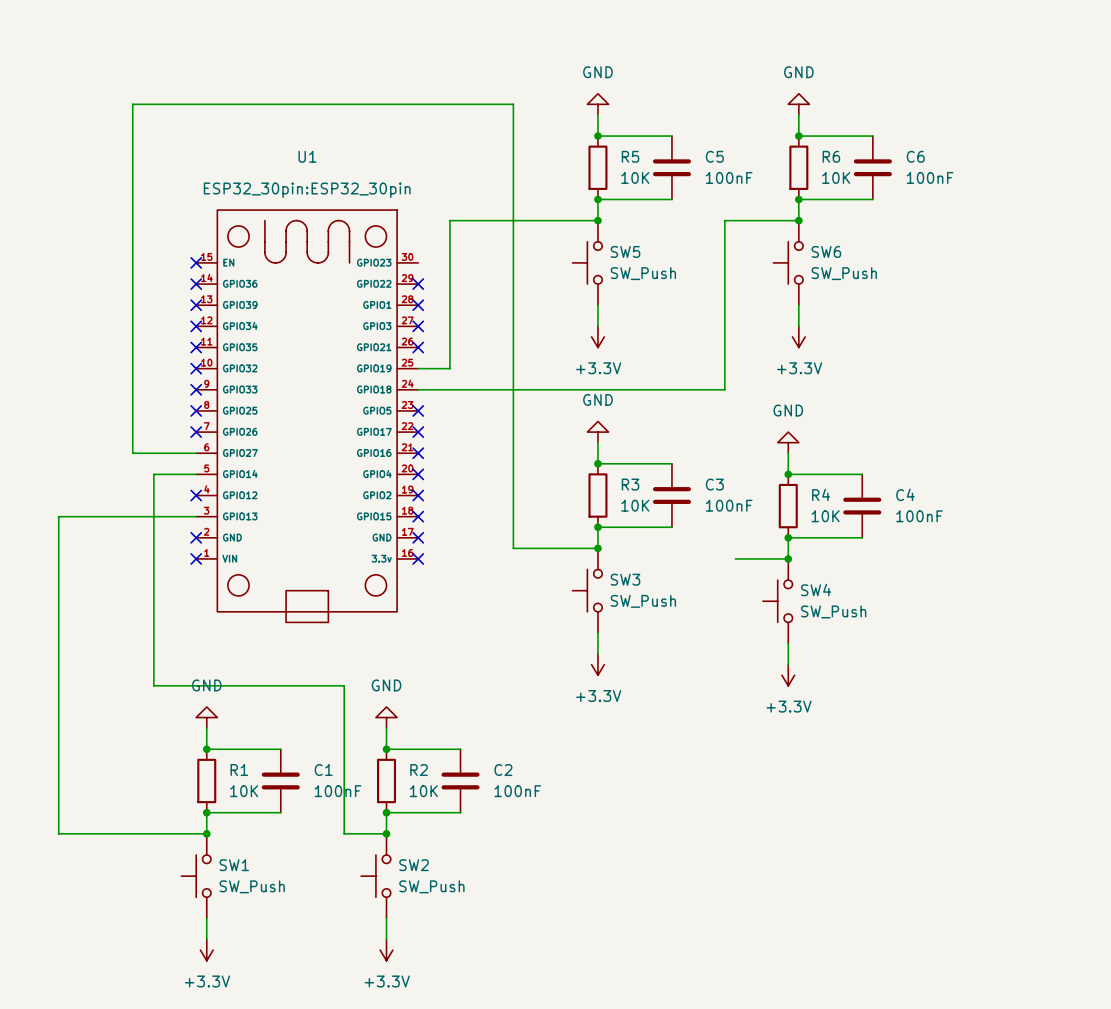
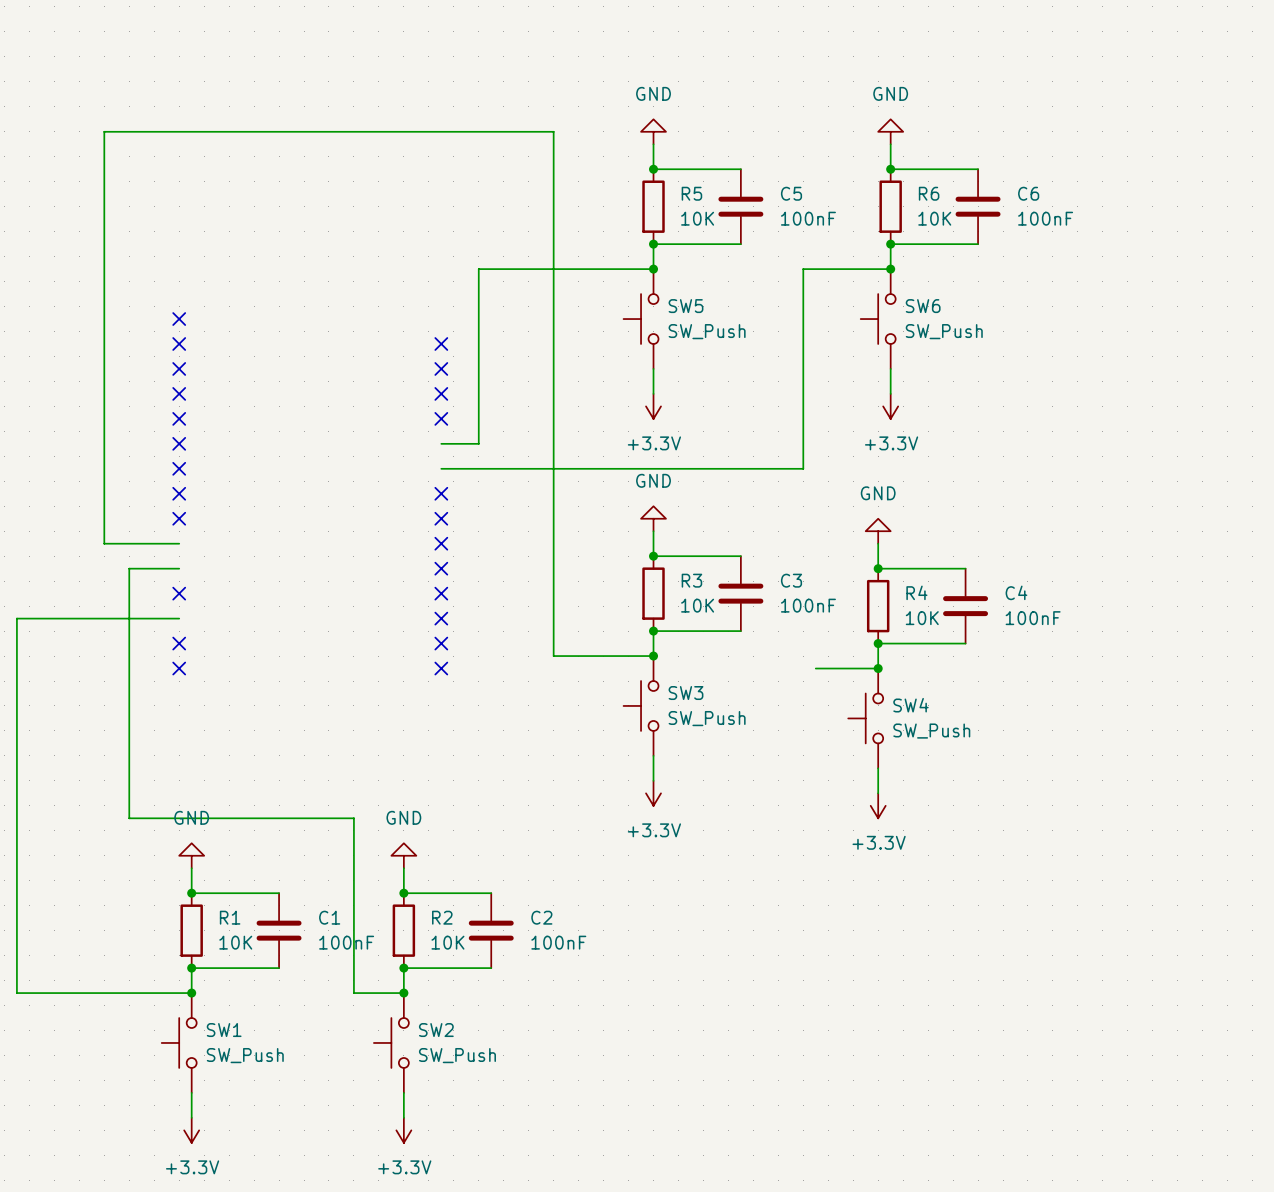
U1: (307, 416) -> none

